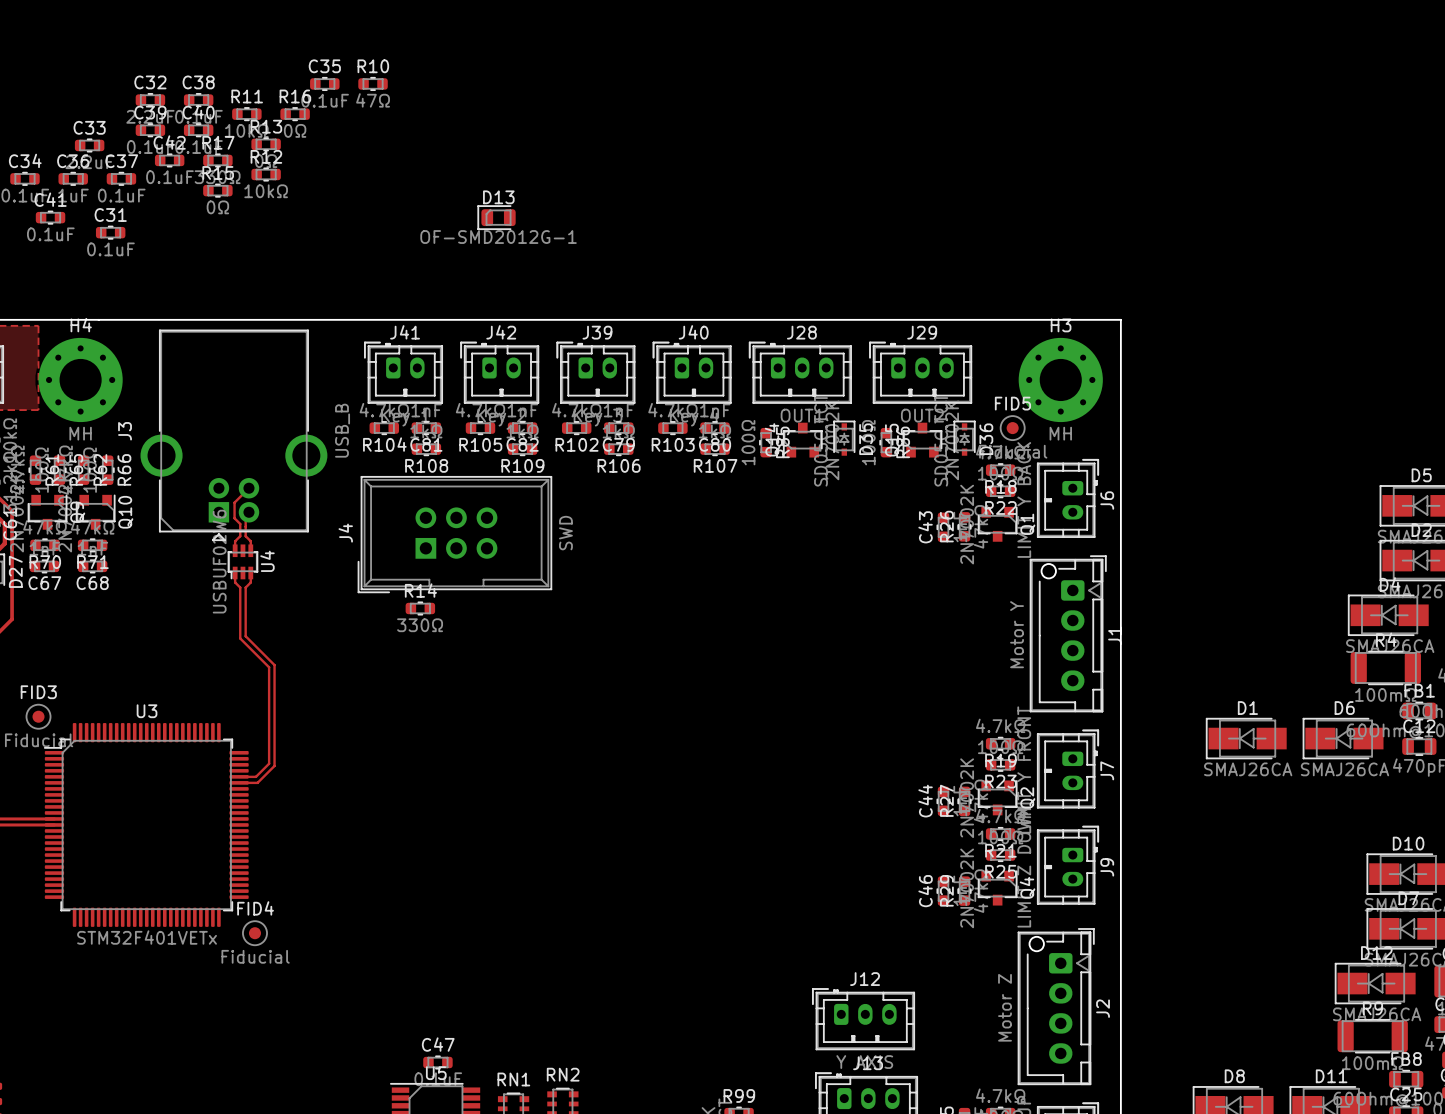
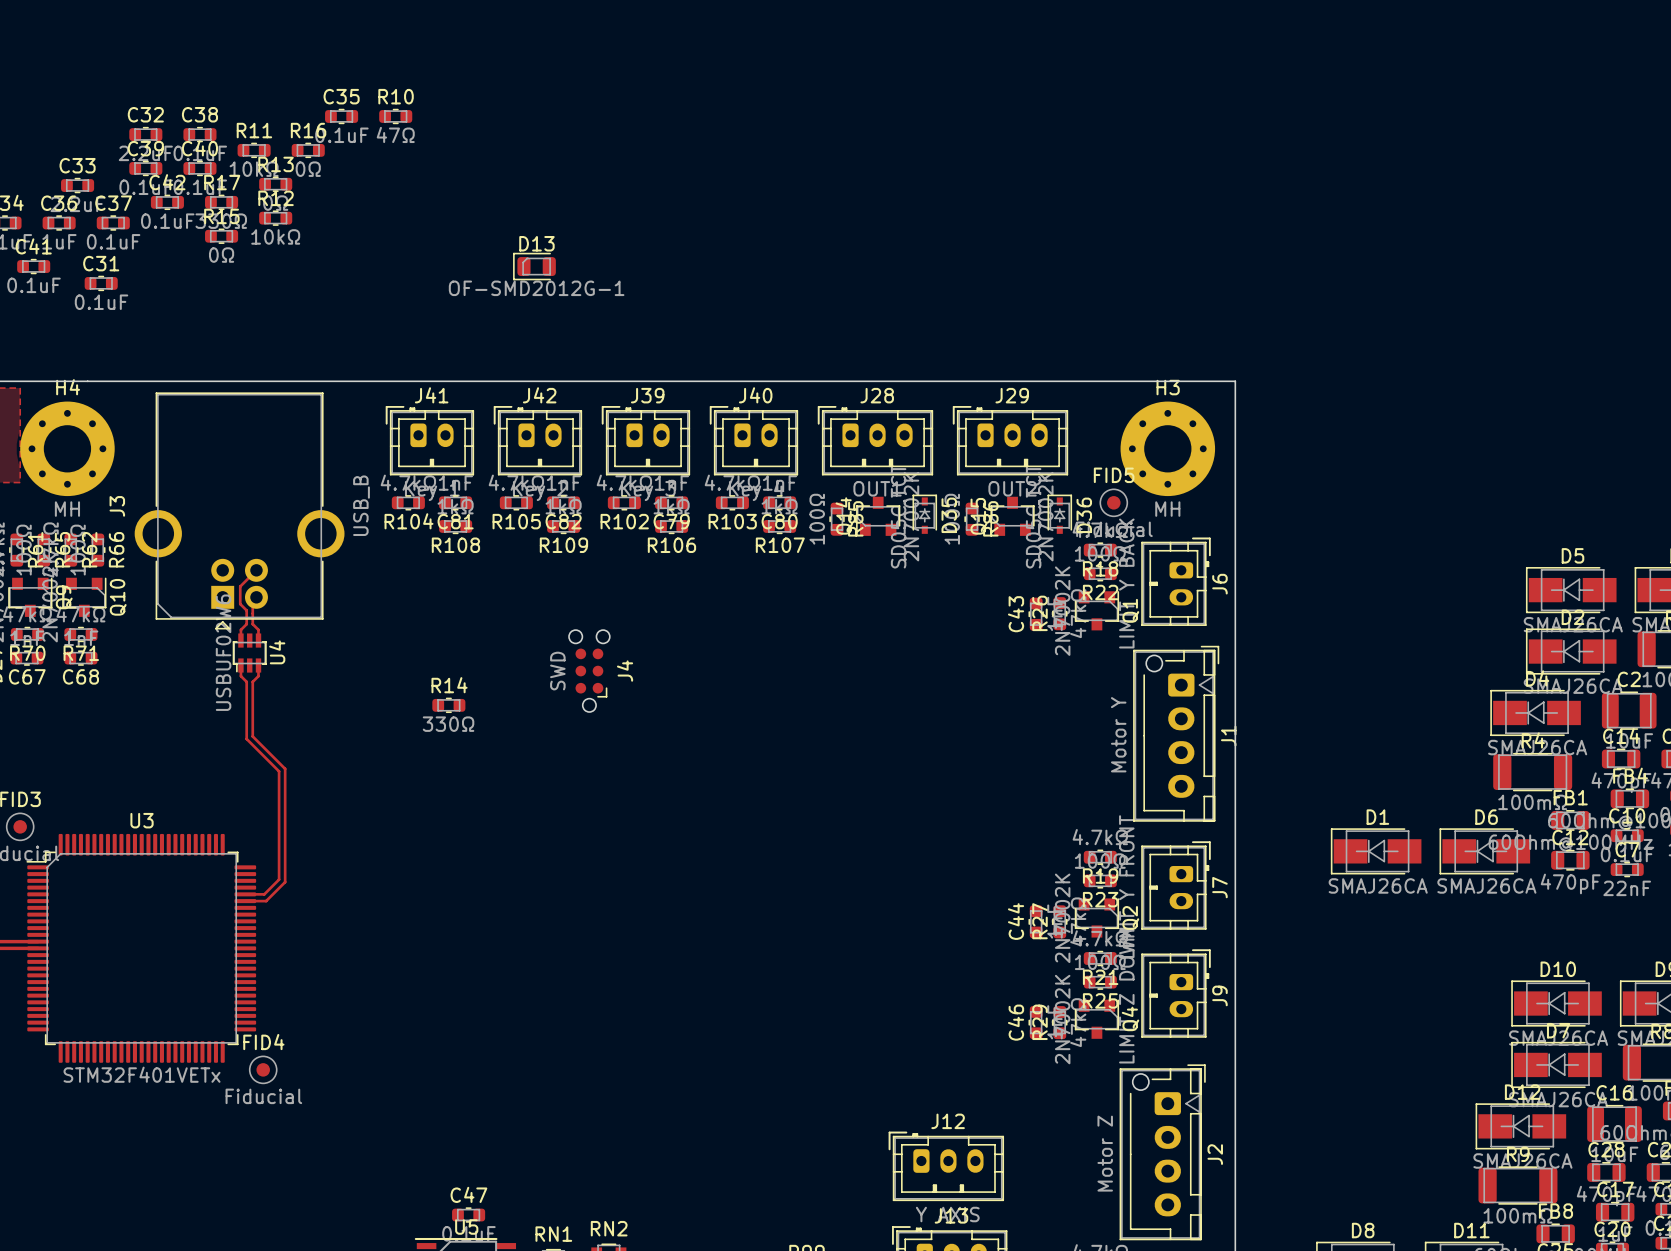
J4 footprint: [357, 476, 553, 594] -> [569, 630, 610, 713]
J4 name position: J4 (345, 533) -> J4 (625, 671)
J4 value position: SWD (565, 533) -> SWD (557, 671)

